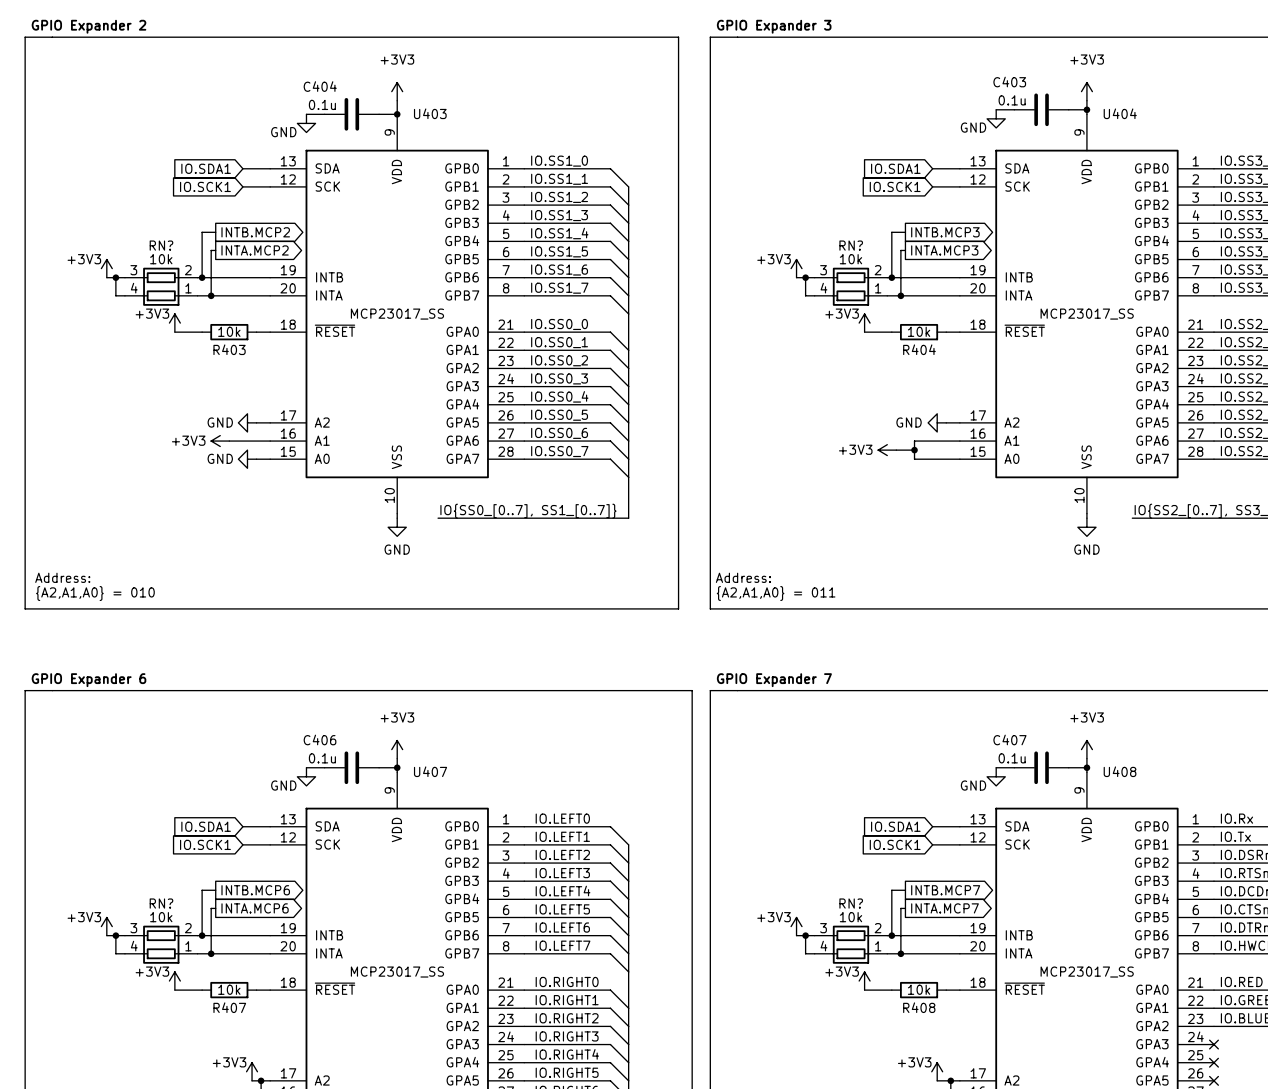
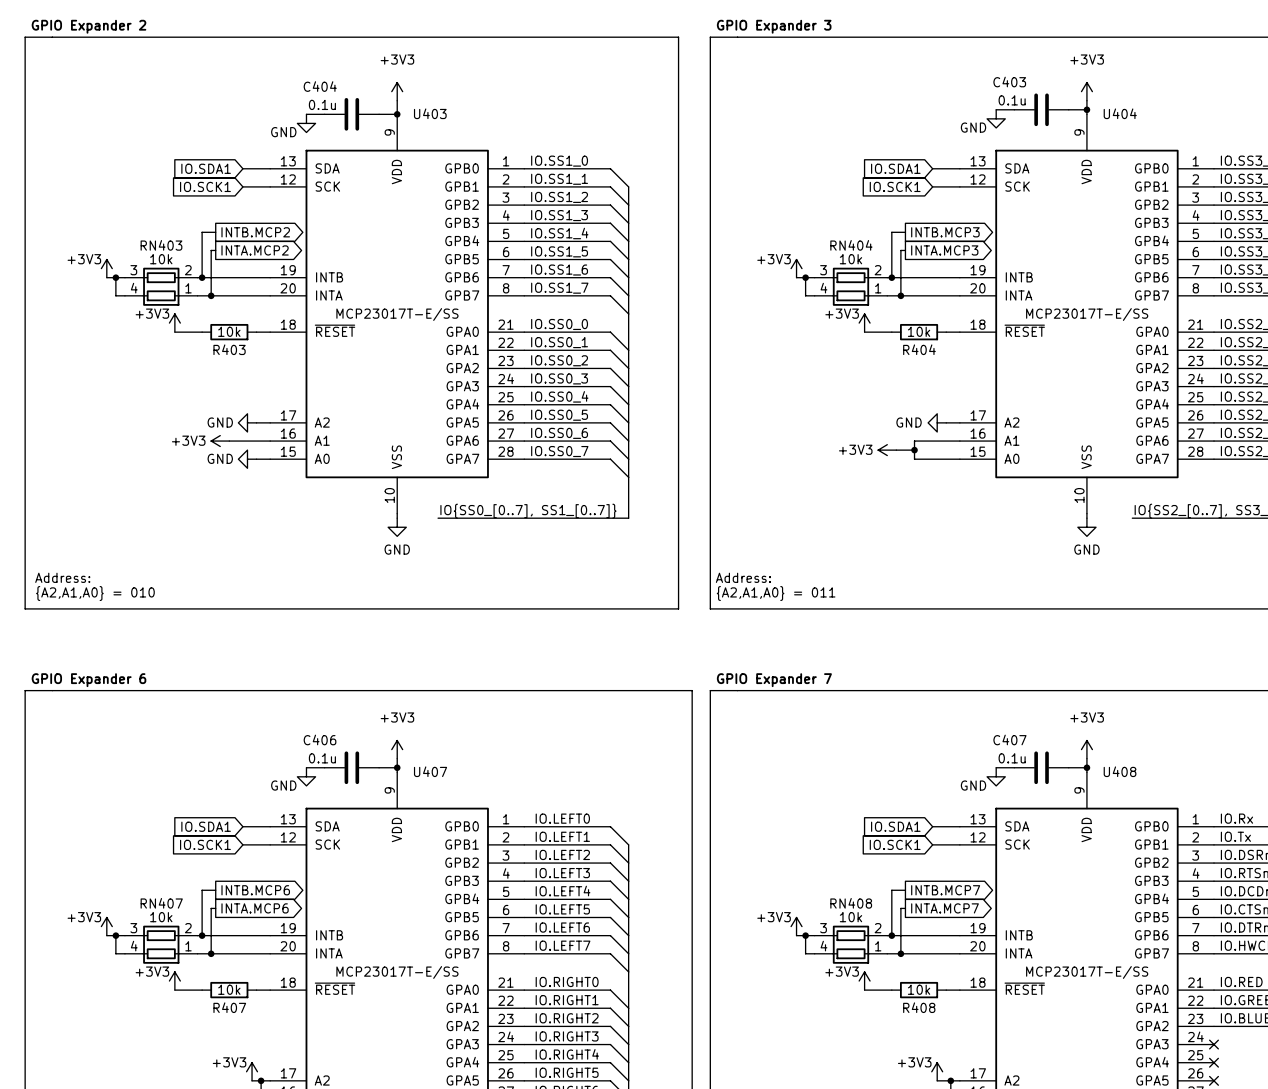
RN? name: RN? (161, 245) -> RN403 (161, 245)
RN? name: RN? (851, 245) -> RN404 (851, 245)
U403 value: MCP23017_SS (397, 314) -> MCP23017T-E/SS (397, 314)
U404 value: MCP23017_SS (1087, 314) -> MCP23017T-E/SS (1087, 314)
RN? name: RN? (161, 903) -> RN407 (161, 903)
RN? name: RN? (851, 903) -> RN408 (851, 903)
U407 value: MCP23017_SS (397, 972) -> MCP23017T-E/SS (397, 972)
U408 value: MCP23017_SS (1087, 972) -> MCP23017T-E/SS (1087, 972)

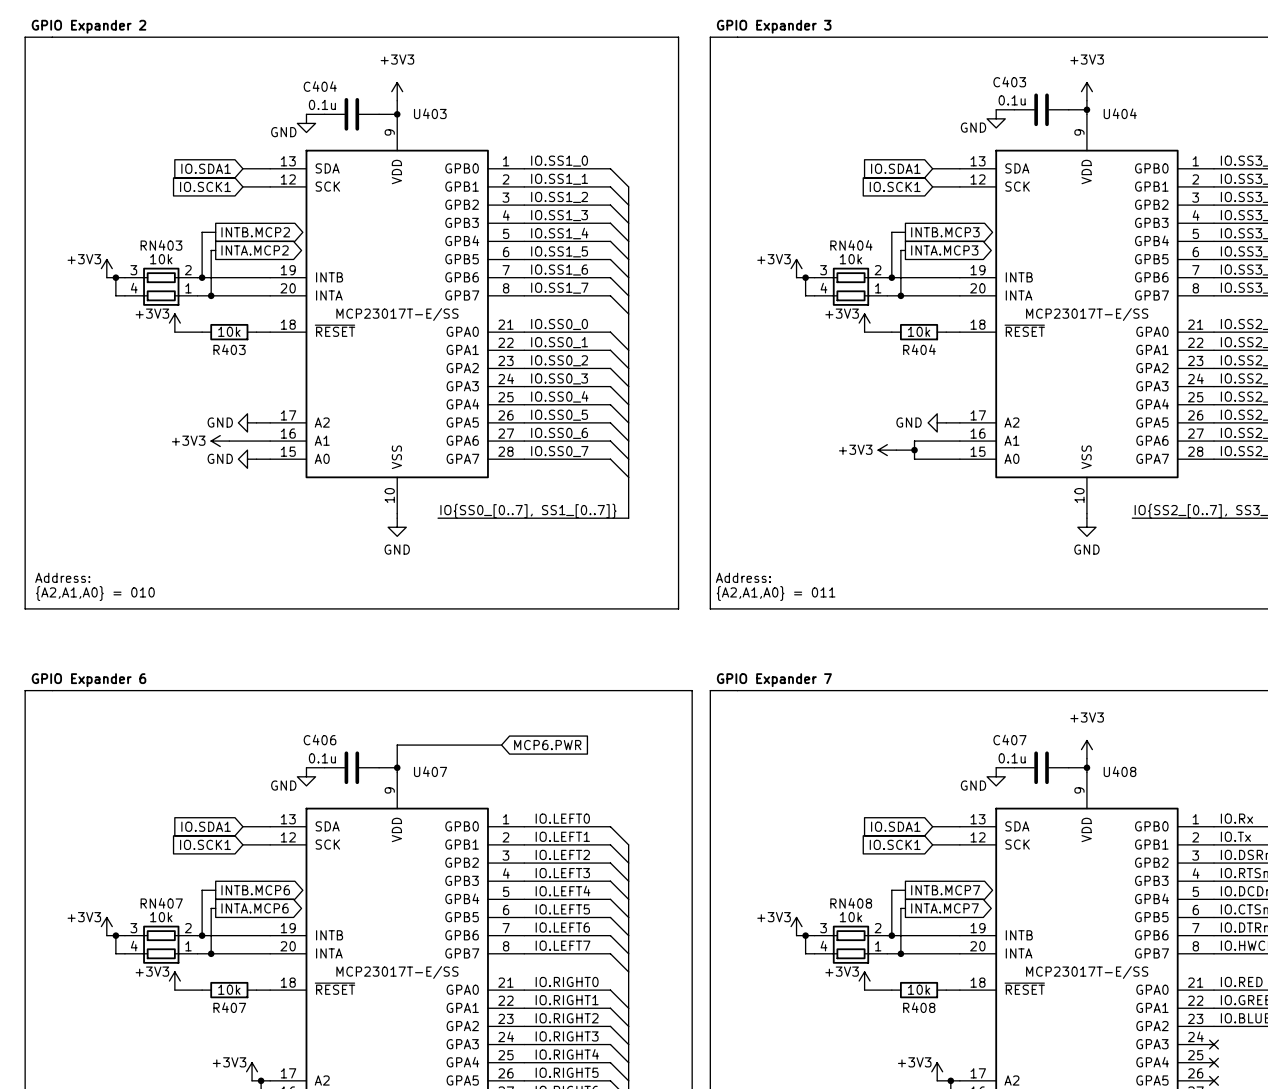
wire: none -> (501, 745) (397, 745) (397, 758)
global label: none -> MCP6.PWR (547, 745)
power symbol: +3V3 (397, 749) -> none

